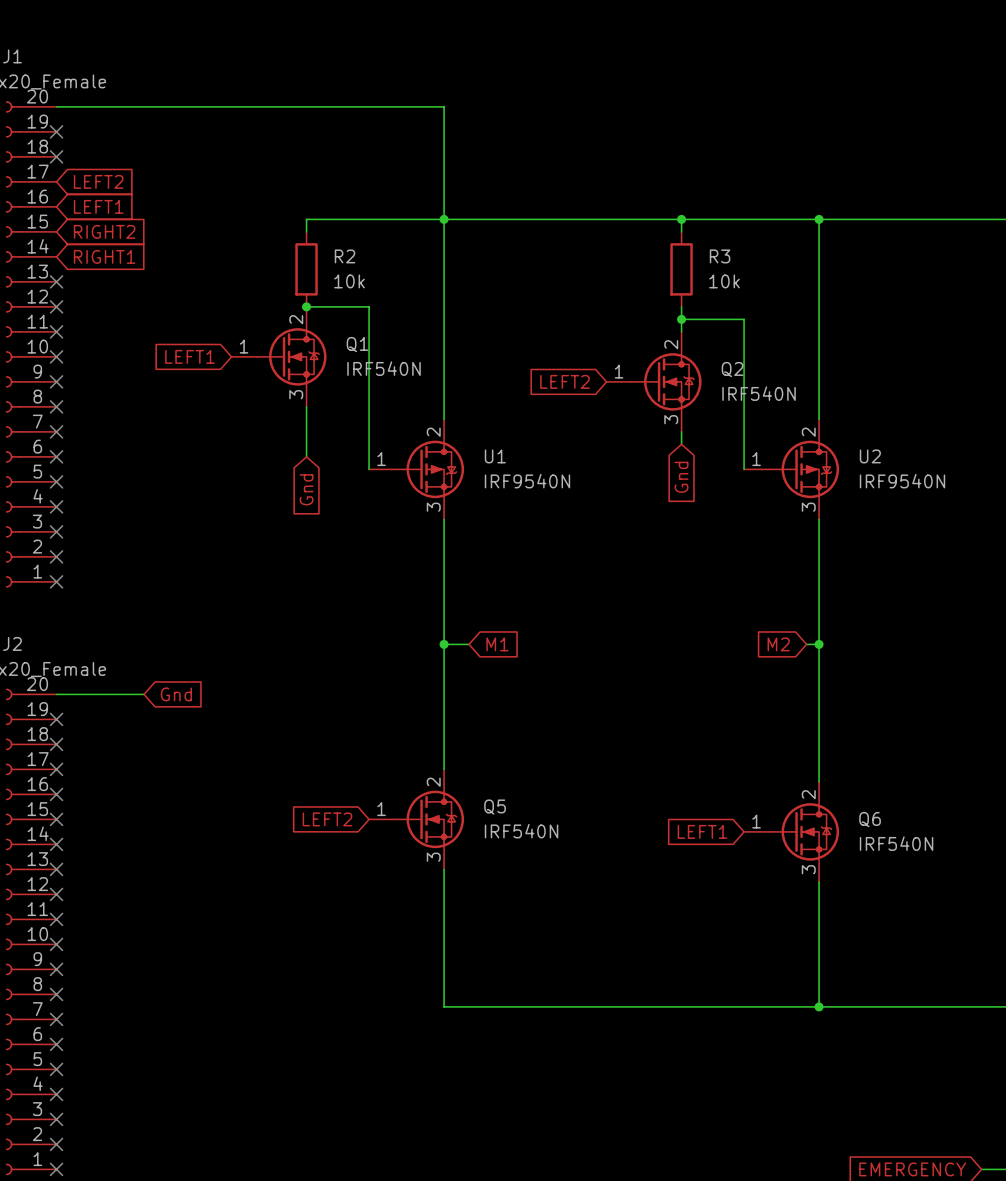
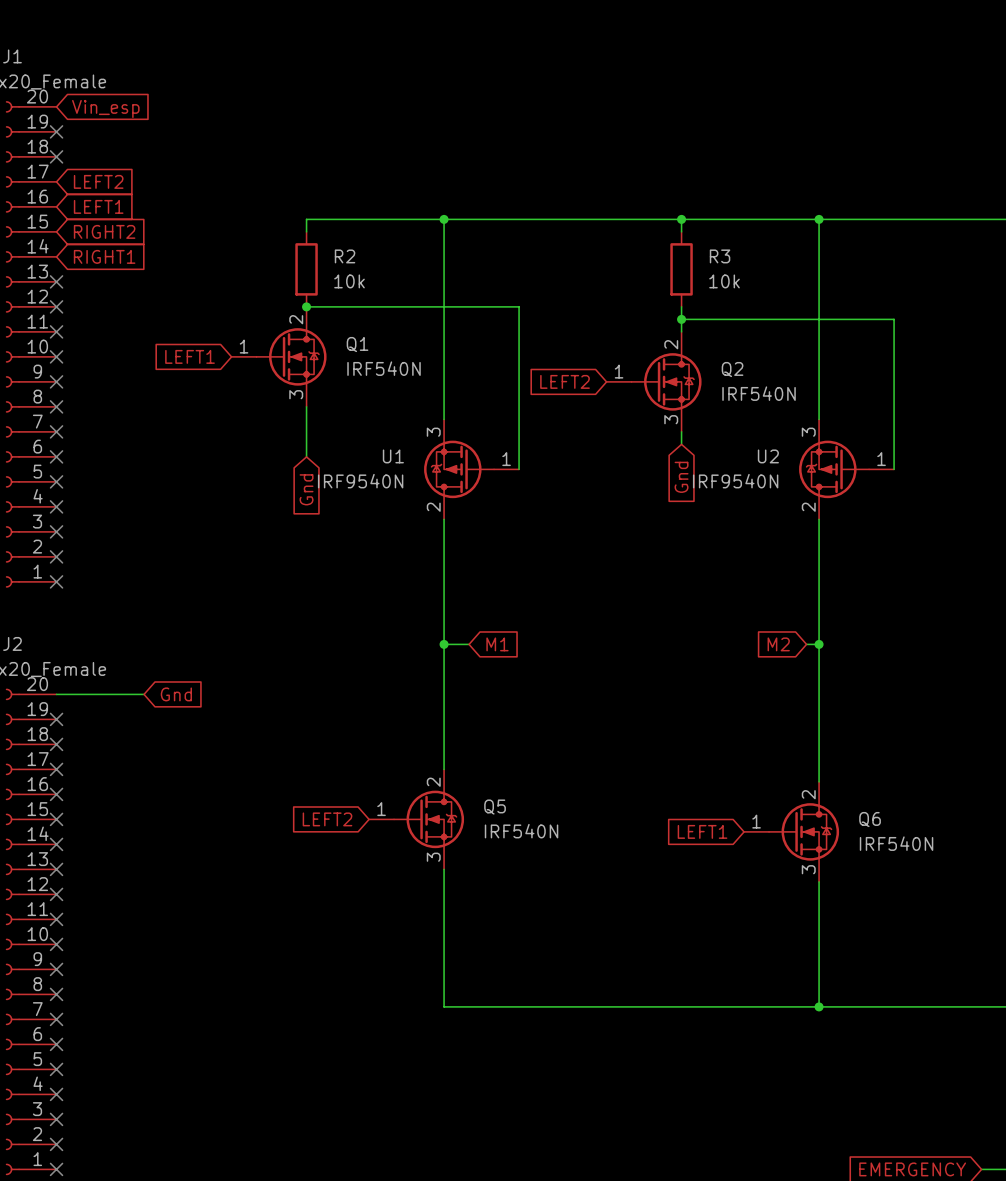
wire: (56, 106) (444, 106) (444, 219) -> none
global label: none -> Vin_esp (105, 108)
wire: (369, 306) (369, 469) -> (369, 306) (519, 306) (519, 469)
wire: (744, 319) (744, 469) -> (744, 319) (894, 319) (894, 469)
U1 name position: U1 (495, 456) -> U1 (393, 456)
U2 name position: U2 (870, 456) -> U2 (768, 456)
U1 rotation: 0° (429, 469) -> 180° (459, 469)
U2 rotation: 0° (804, 469) -> 180° (834, 469)
U1 value position: IRF9540N (527, 481) -> IRF9540N (360, 481)
U2 value position: IRF9540N (902, 481) -> IRF9540N (735, 481)

